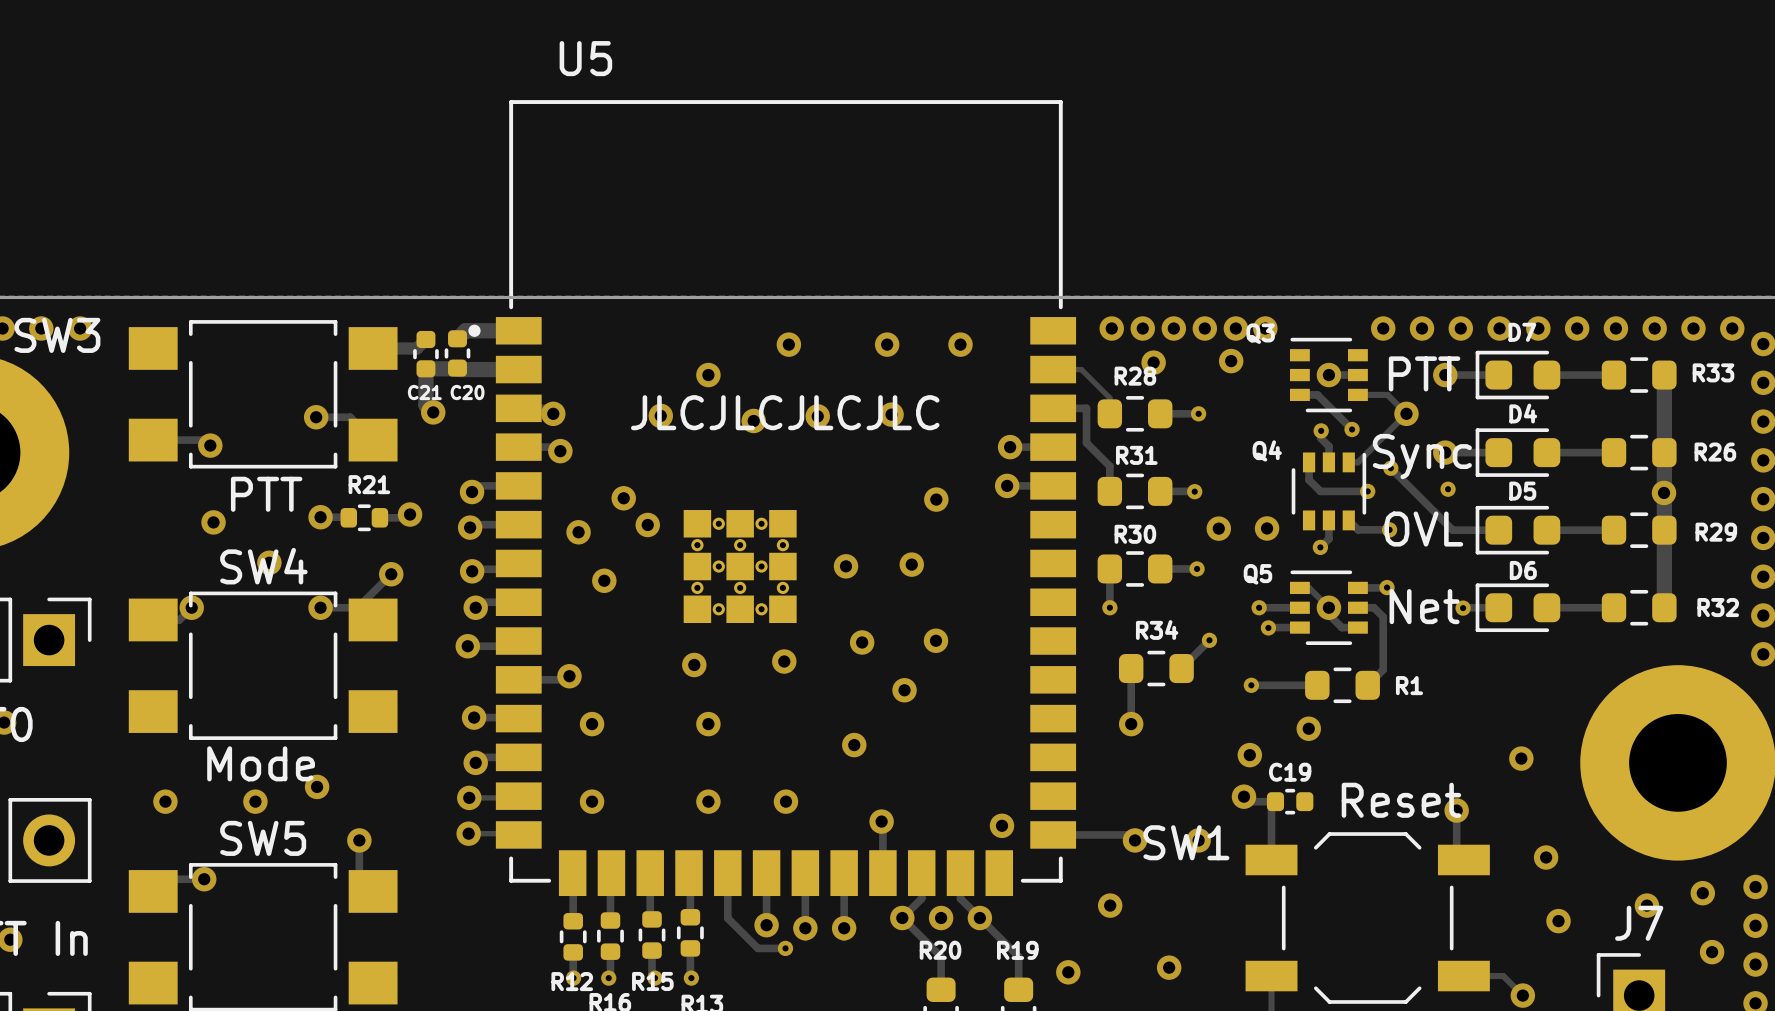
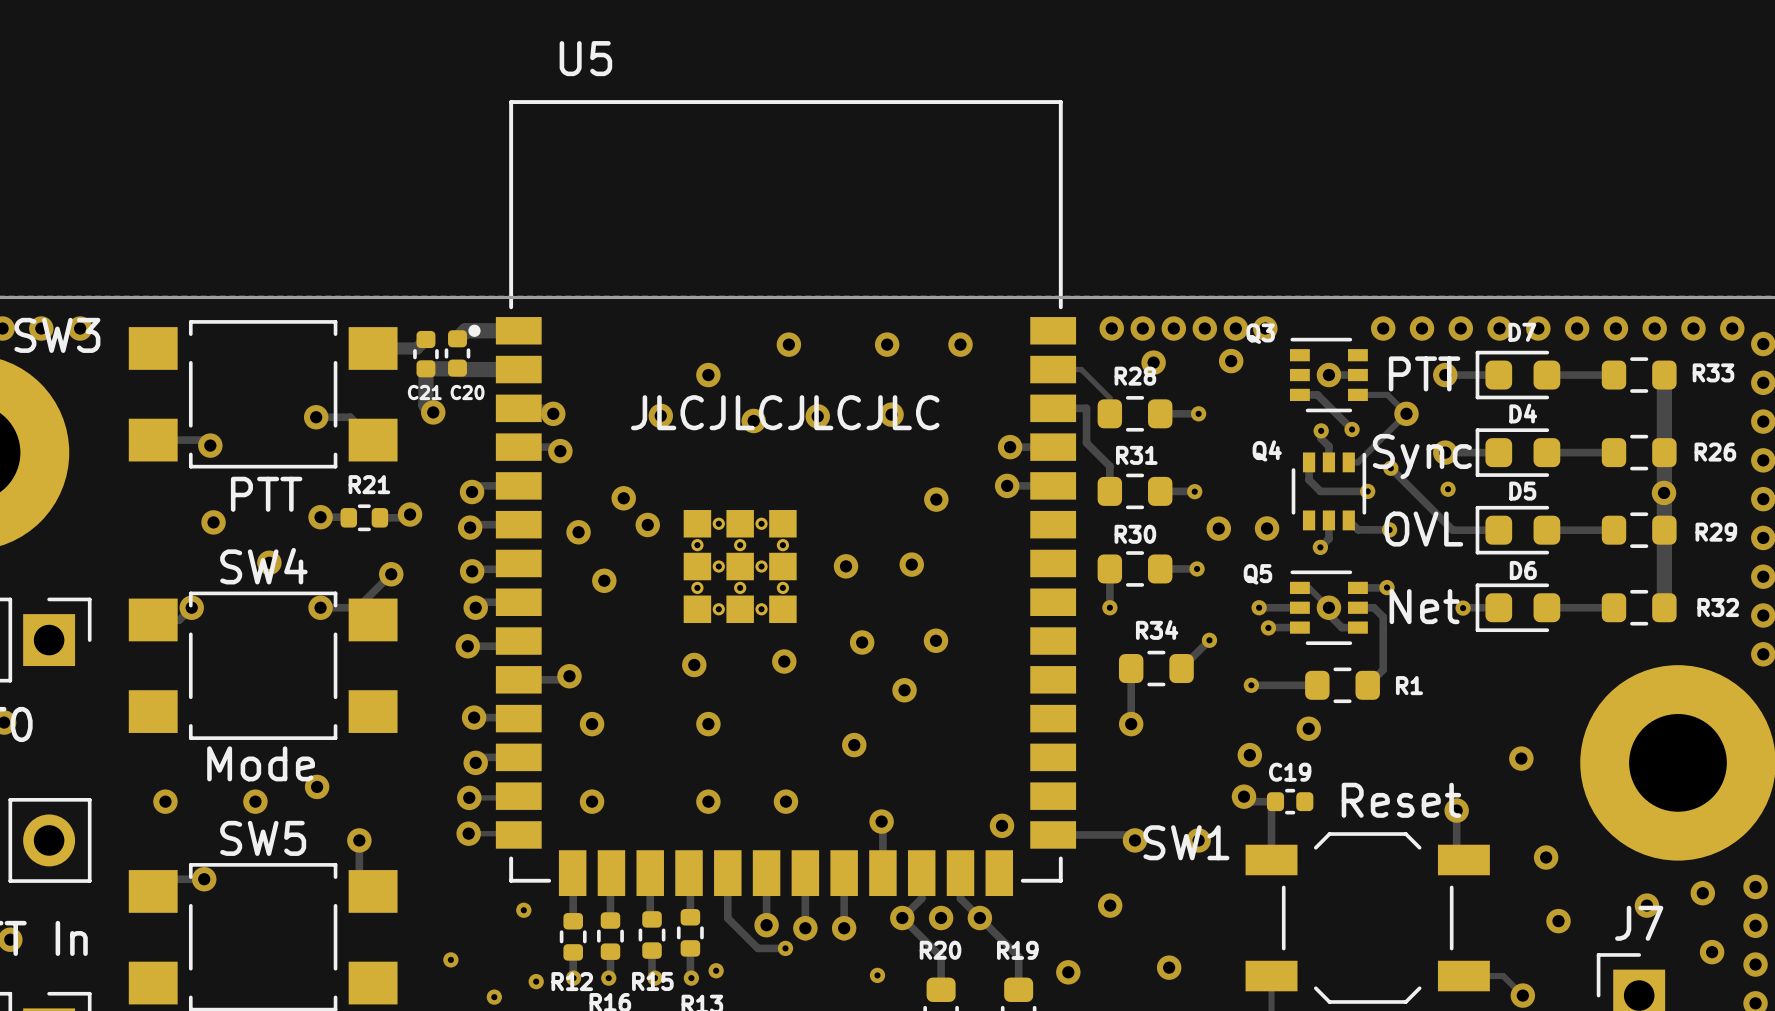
via: none -> (523, 910)
via: none -> (450, 959)
via: none -> (716, 970)
via: none -> (877, 975)
via: none -> (536, 981)
via: none -> (494, 997)

